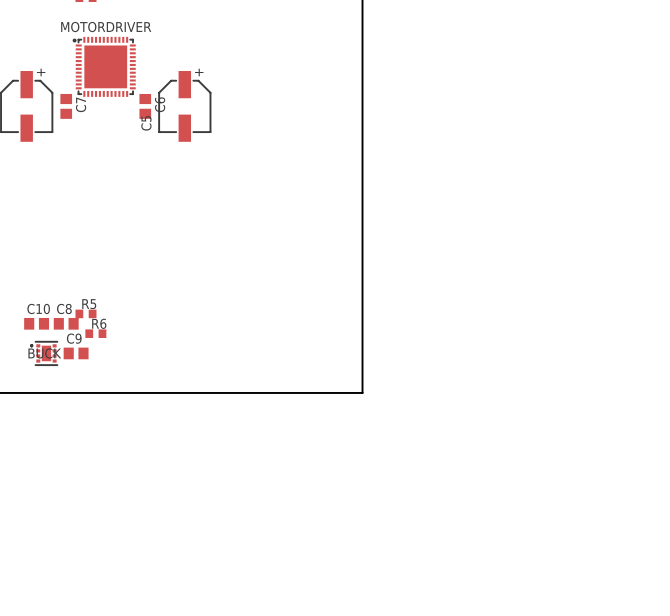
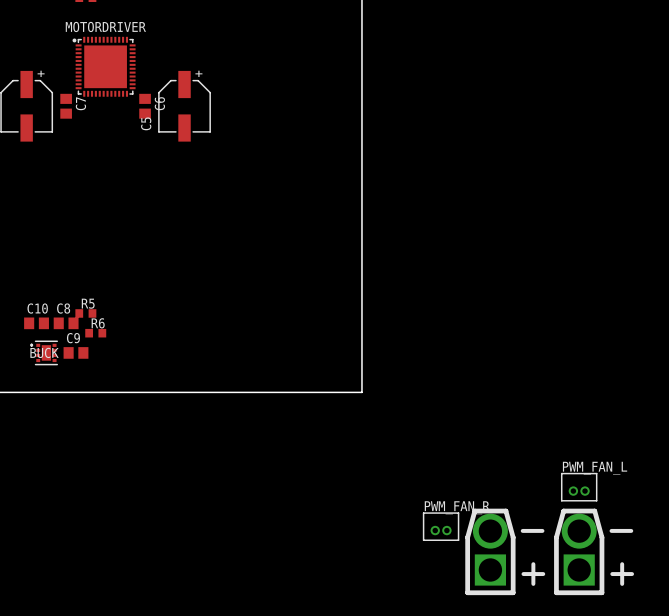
PWM_FAN_L: none -> (579, 487)
PWM_FAN_R: none -> (441, 526)
part: none -> (505, 551)
part: none -> (594, 551)

